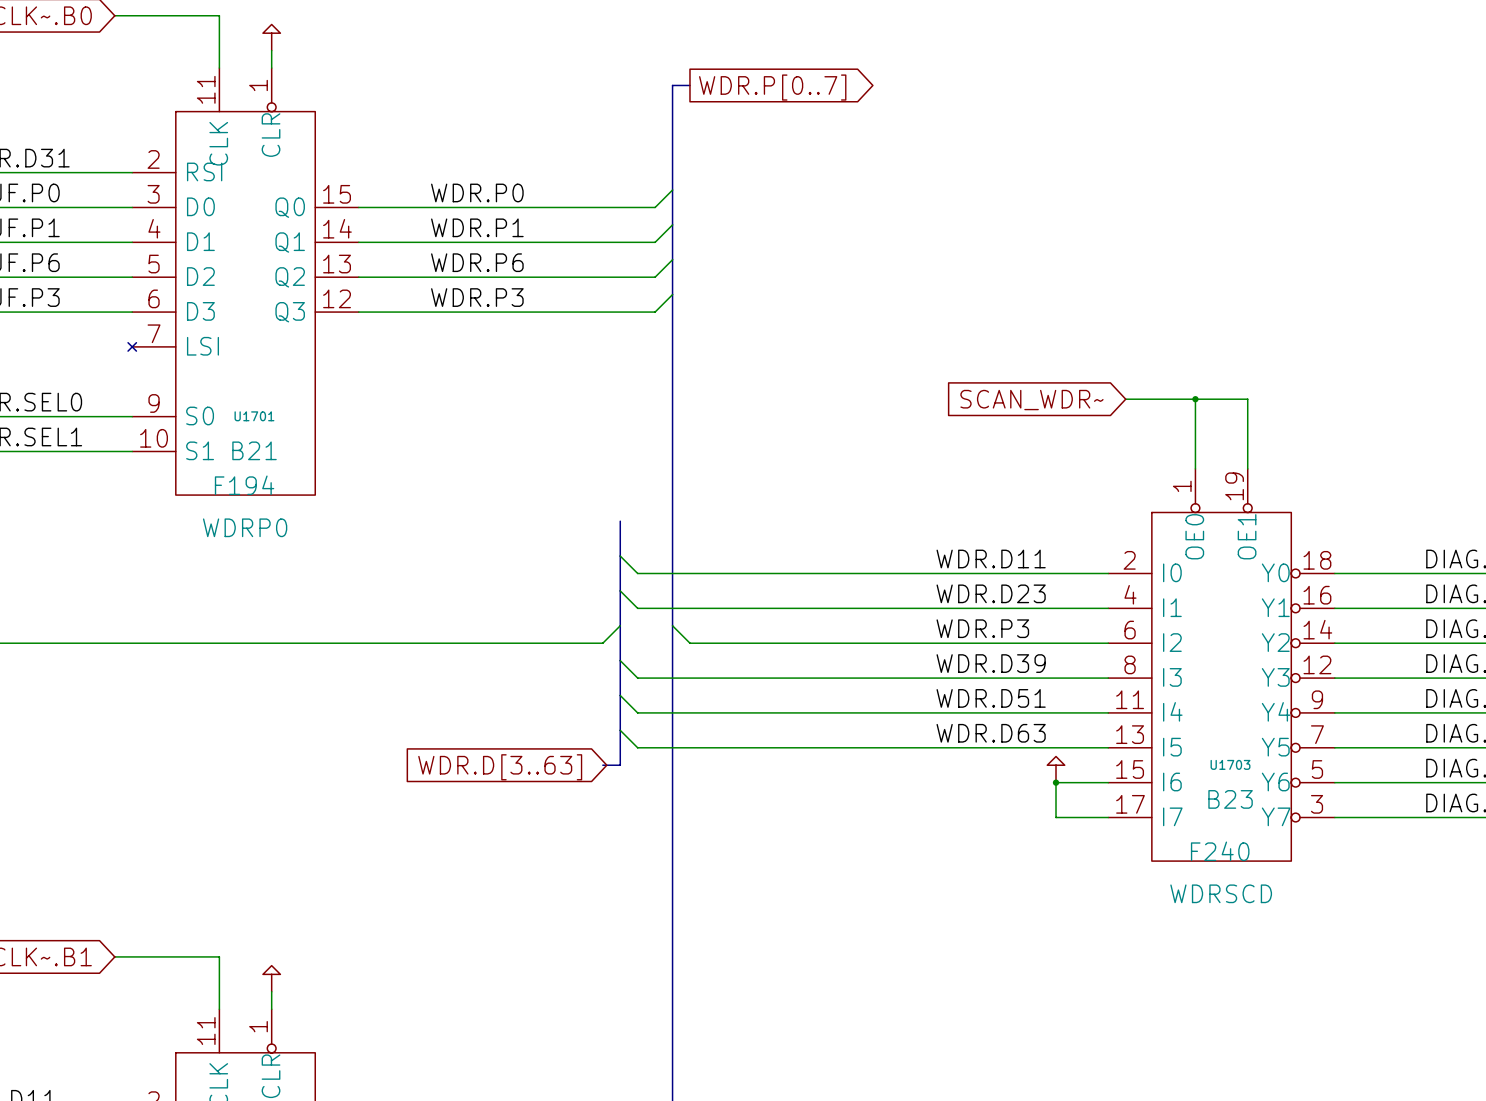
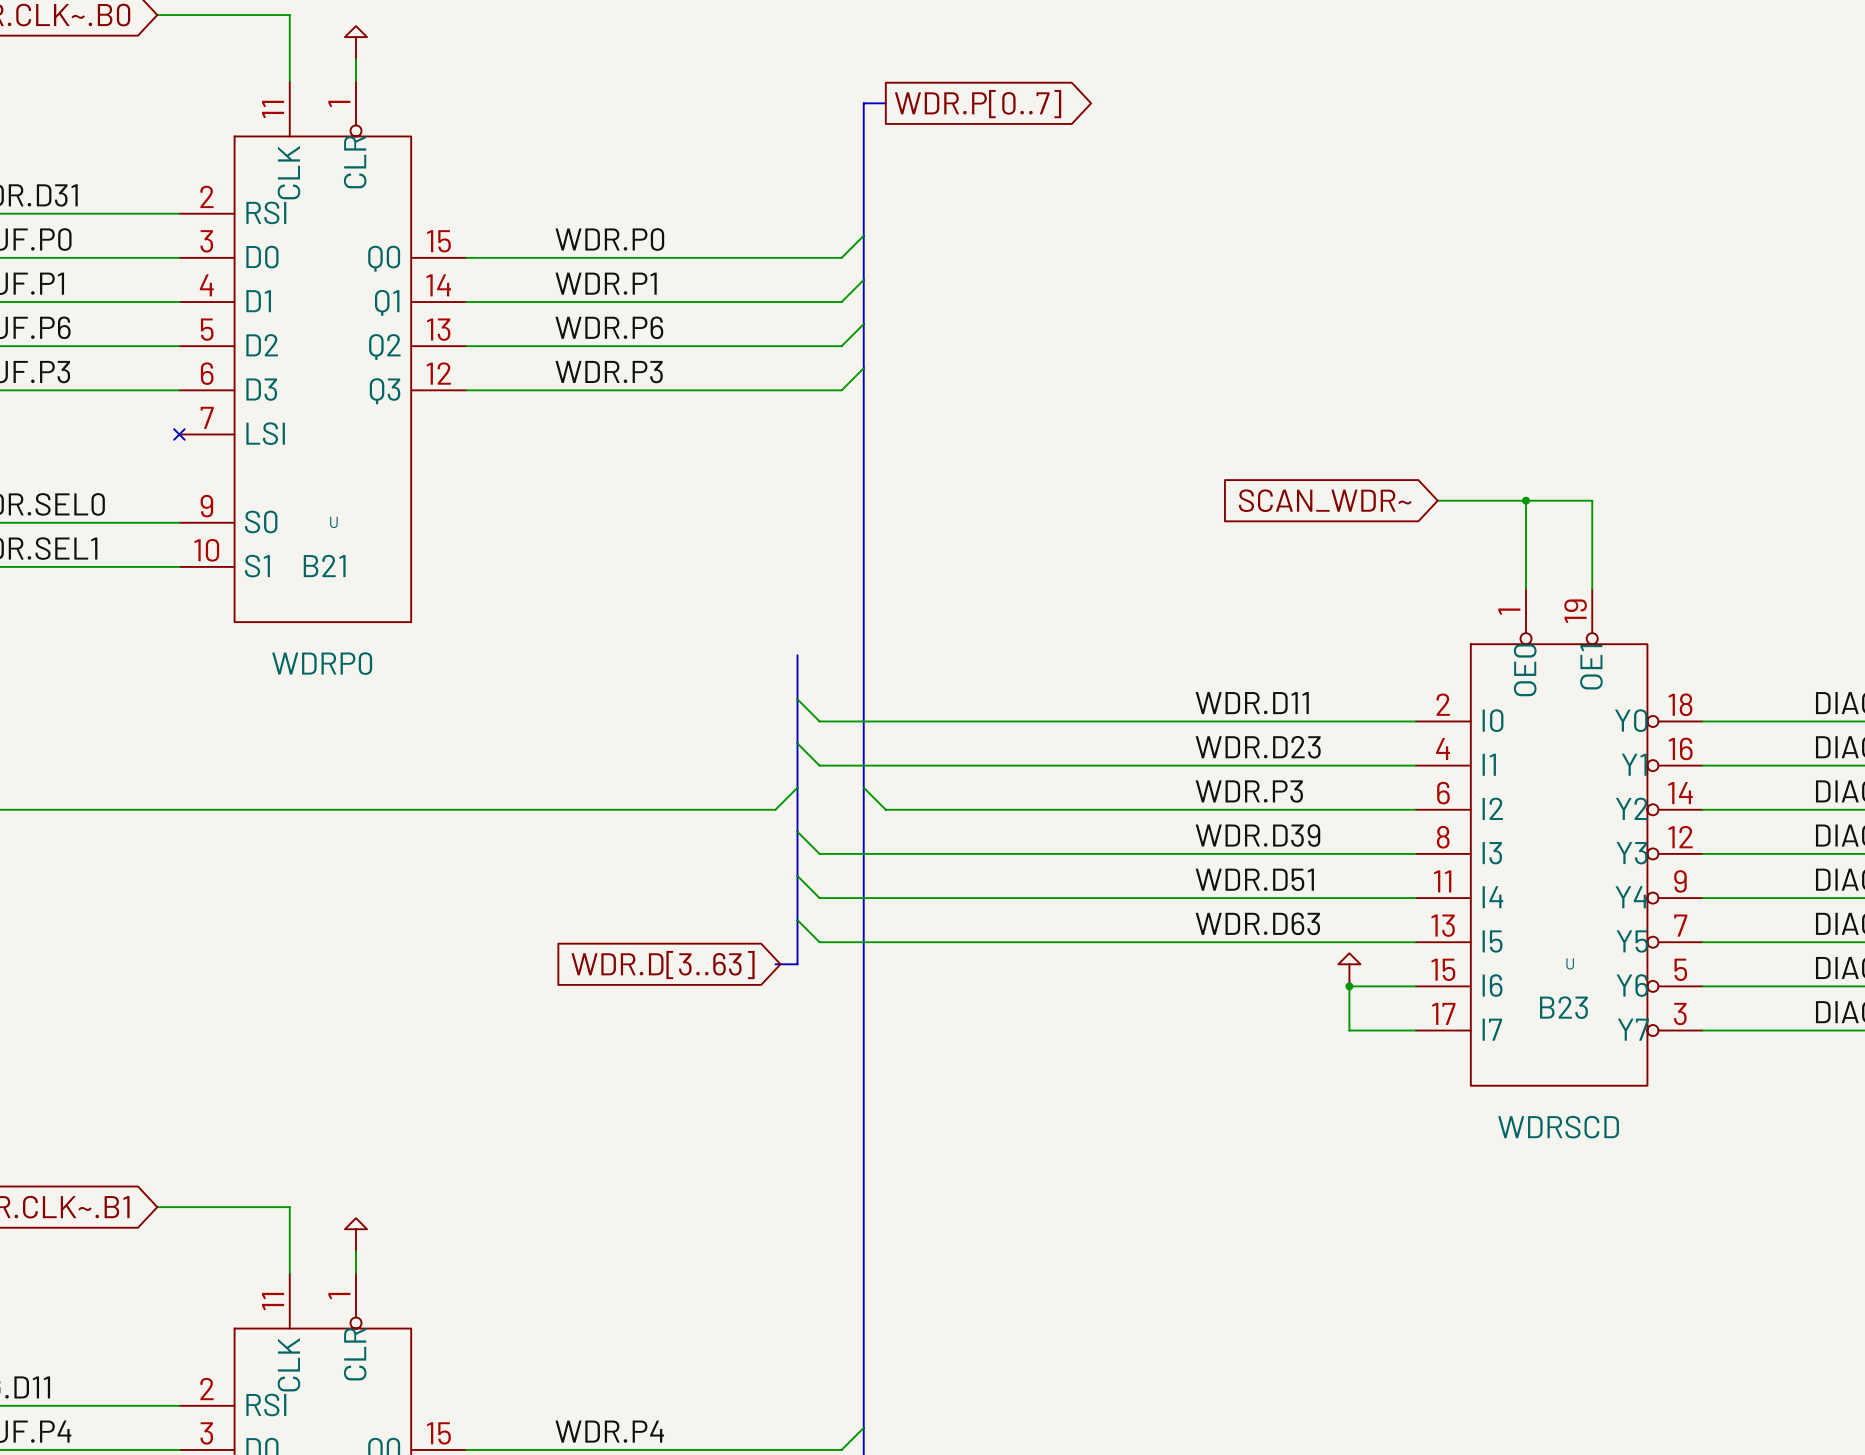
U1701 name: U1701 (254, 416) -> U (333, 522)
U1701 value: F194 (244, 485) -> none
U1703 name: U1703 (1230, 764) -> U (1570, 963)
U1703 value: F240 (1220, 851) -> none

